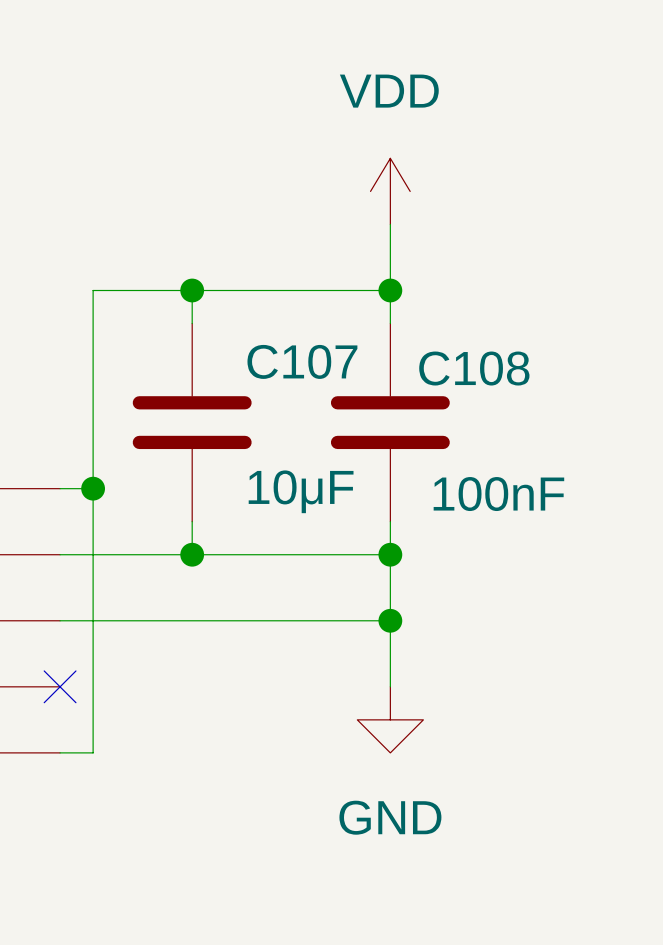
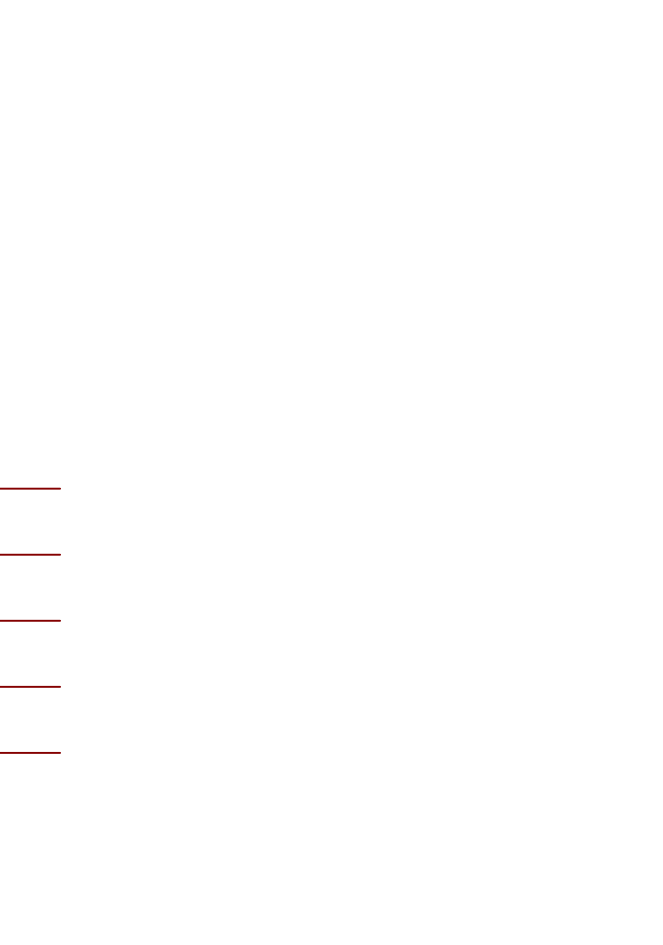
power symbol: VDD (390, 191) -> none
wire: (390, 224) (390, 323) -> none
wire: (192, 290) (192, 323) -> none
junction: (192, 290) -> none
wire: (390, 290) (93, 290) (93, 752) (60, 752) -> none
junction: (390, 290) -> none
C107: 10μF (192, 422) -> none
C108: 100nF (390, 422) -> none
wire: (60, 488) (93, 488) -> none
junction: (93, 488) -> none
wire: (192, 521) (192, 554) -> none
wire: (390, 521) (390, 686) -> none
wire: (60, 554) (390, 554) -> none
junction: (192, 554) -> none
junction: (390, 554) -> none
wire: (60, 620) (390, 620) -> none
junction: (390, 620) -> none
no-connect mark: (60, 686) -> none
power symbol: GND (390, 719) -> none

